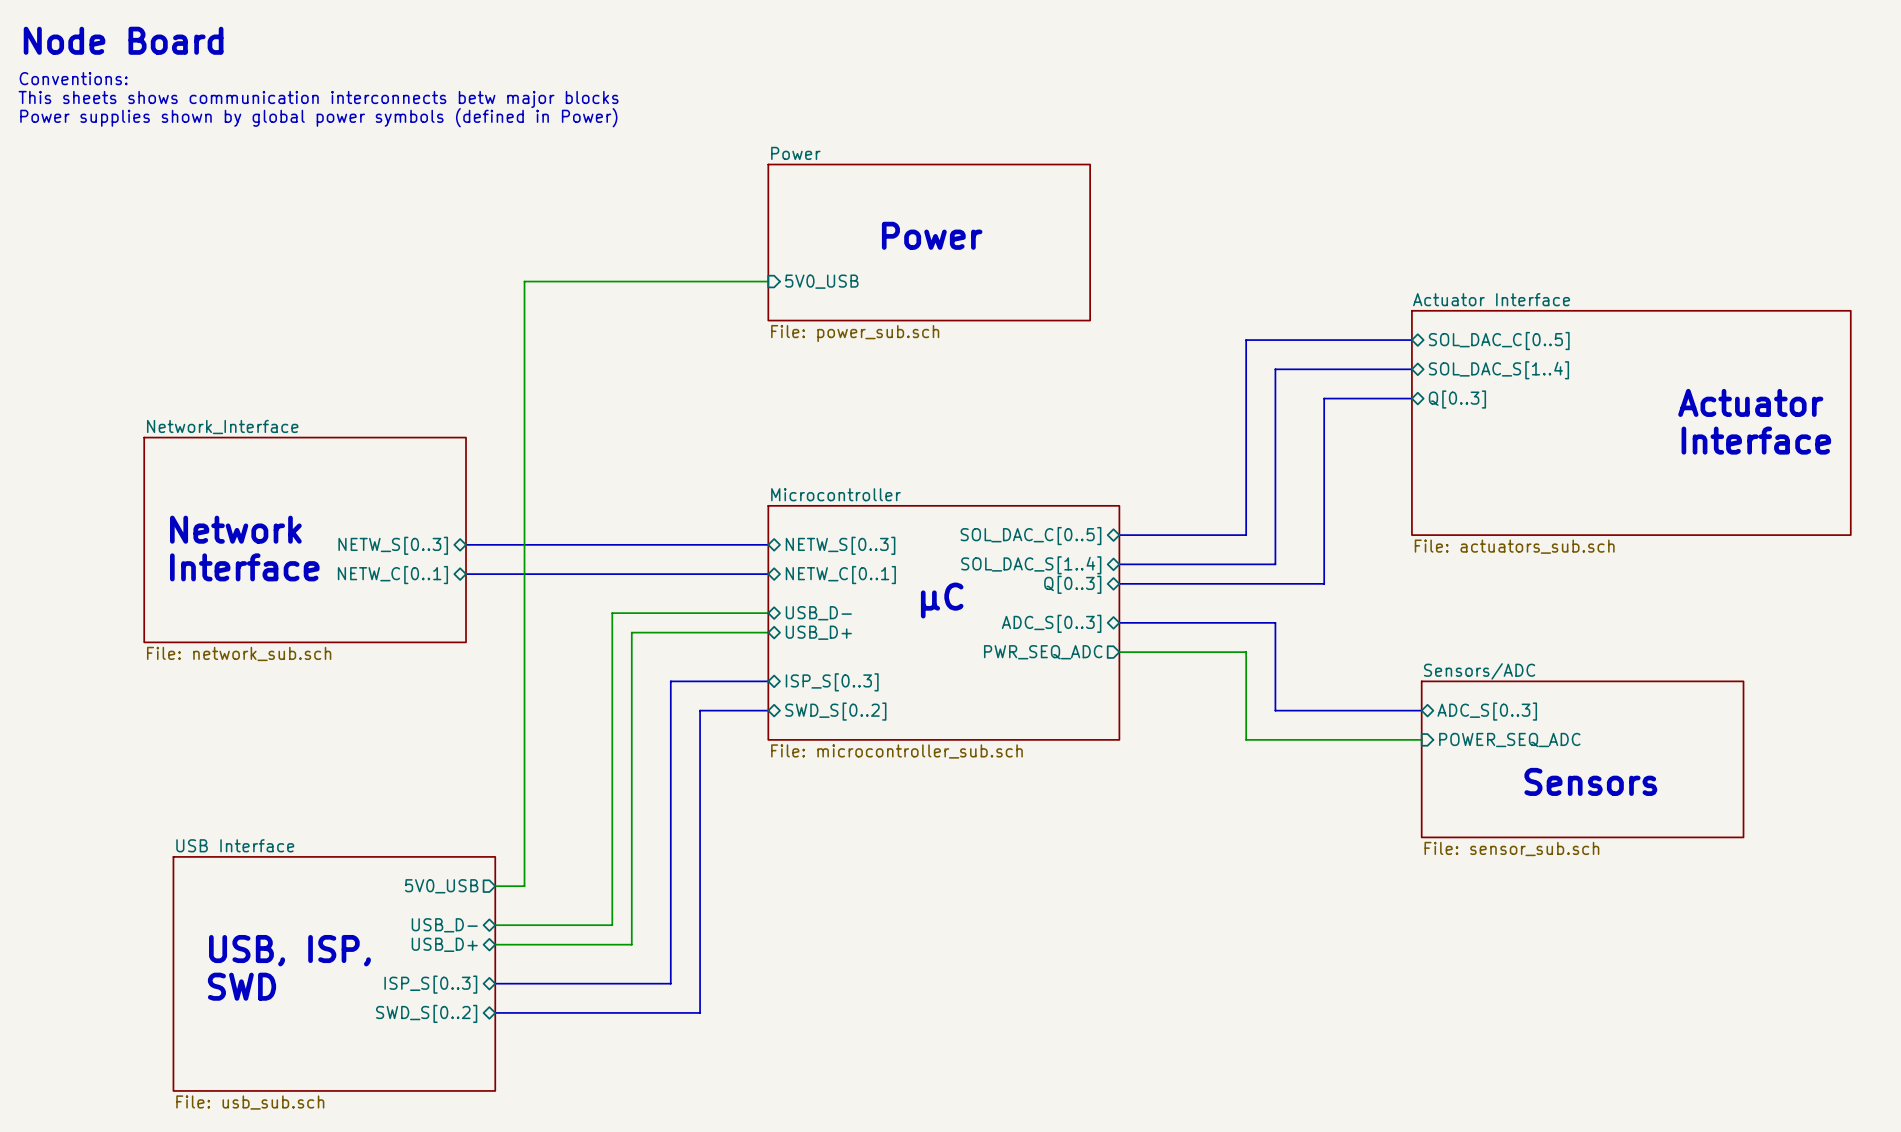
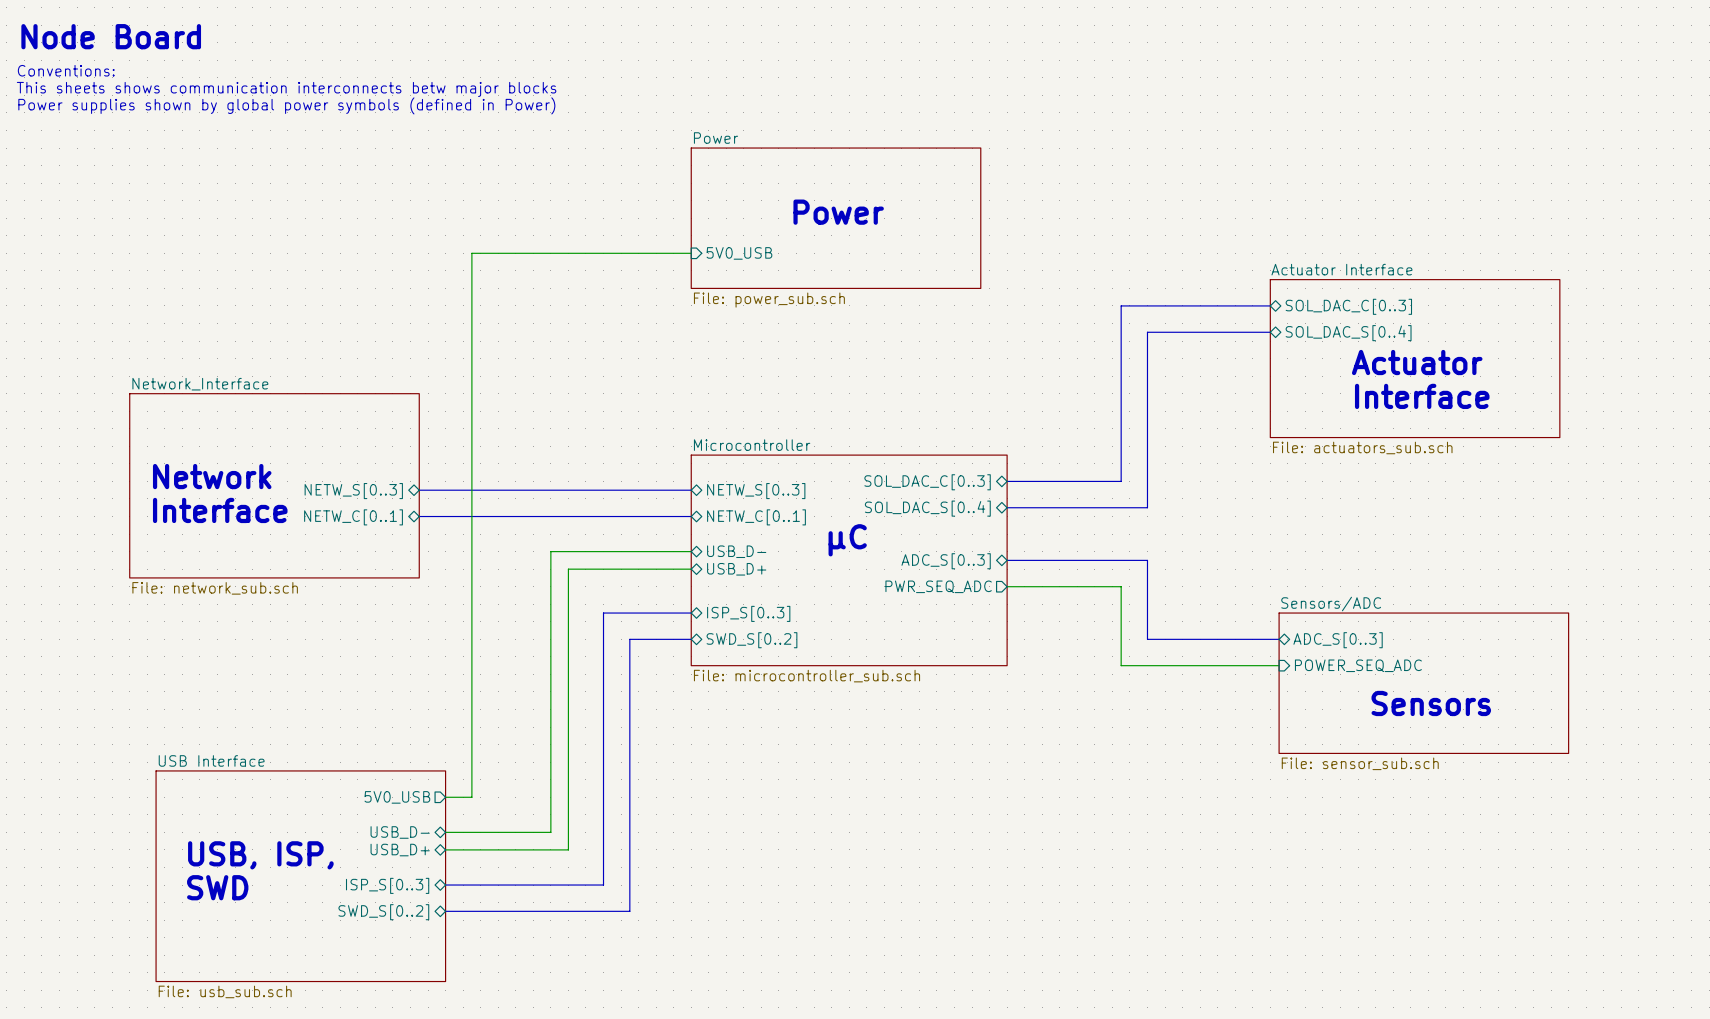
sheet pin: SOL_DAC_C[0..5] (1499, 341) -> SOL_DAC_C[0..3] (1348, 306)
sheet pin: SOL_DAC_S[1..4] (1498, 370) -> SOL_DAC_S[0..4] (1348, 333)
bus: (1411, 398) (1324, 398) (1324, 583) (1119, 583) -> none
sheet Actuator Interface: none -> File: actuators_sub.sch (1415, 358)
sheet pin: Q[0..3] (1457, 399) -> none
text position: Actuator (1750, 402) -> Actuator (1417, 362)
sheet Actuator Interface: File: actuators_sub.sch (1631, 422) -> none
text position: Interface (1756, 440) -> Interface (1422, 396)
sheet pin: SOL_DAC_C[0..5] (1030, 536) -> SOL_DAC_C[0..3] (927, 482)
sheet pin: SOL_DAC_S[1..4] (1031, 565) -> SOL_DAC_S[0..4] (927, 508)
sheet pin: Q[0..3] (1072, 584) -> none

